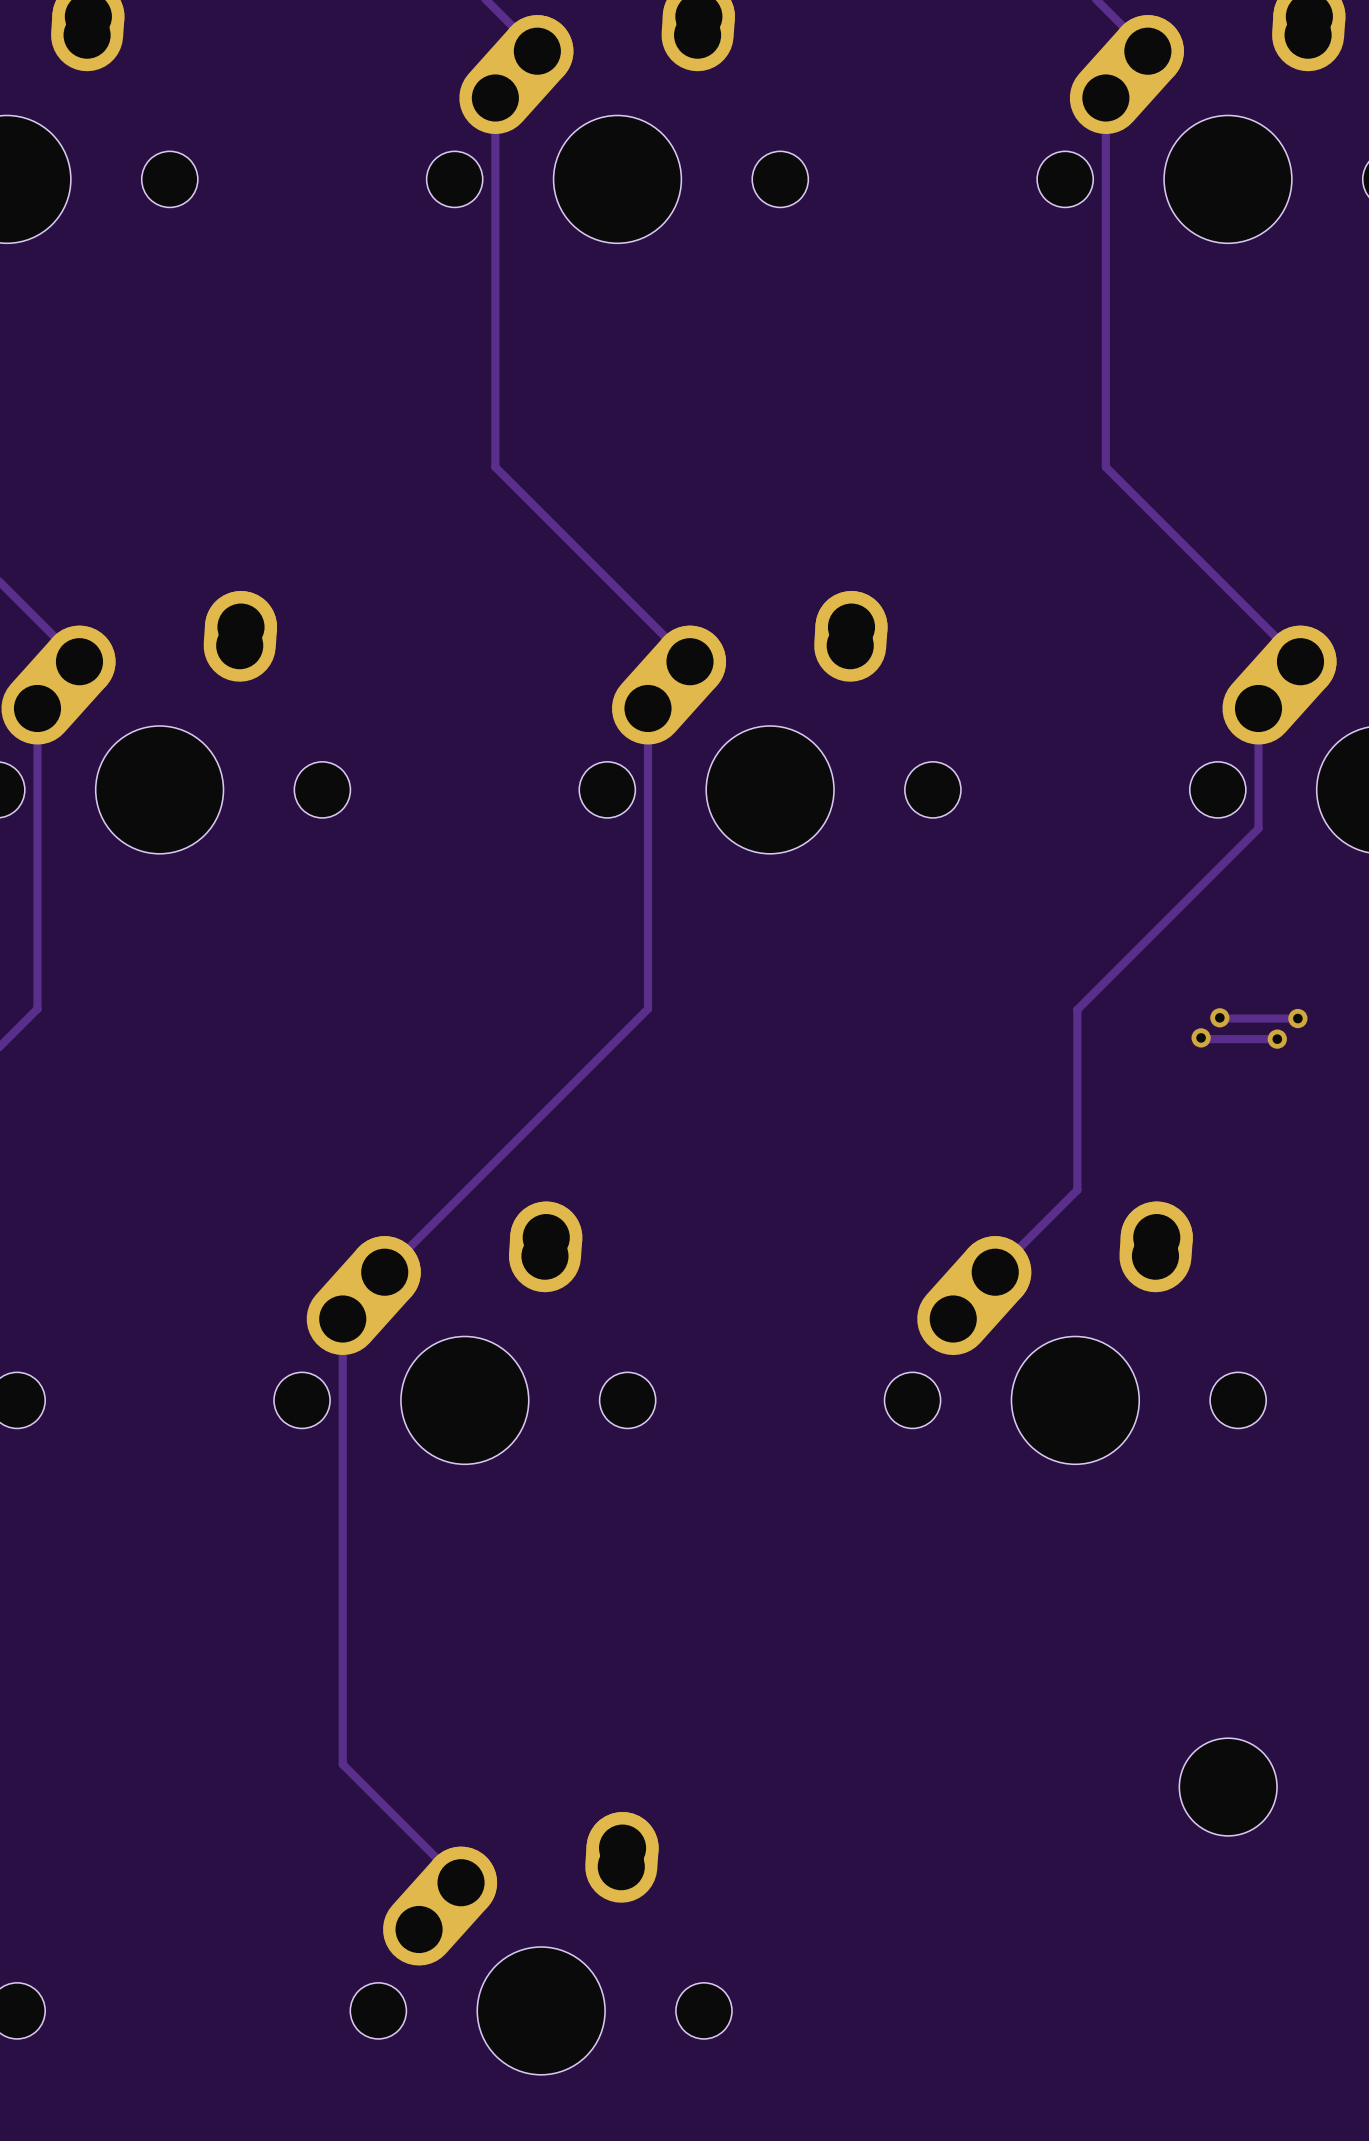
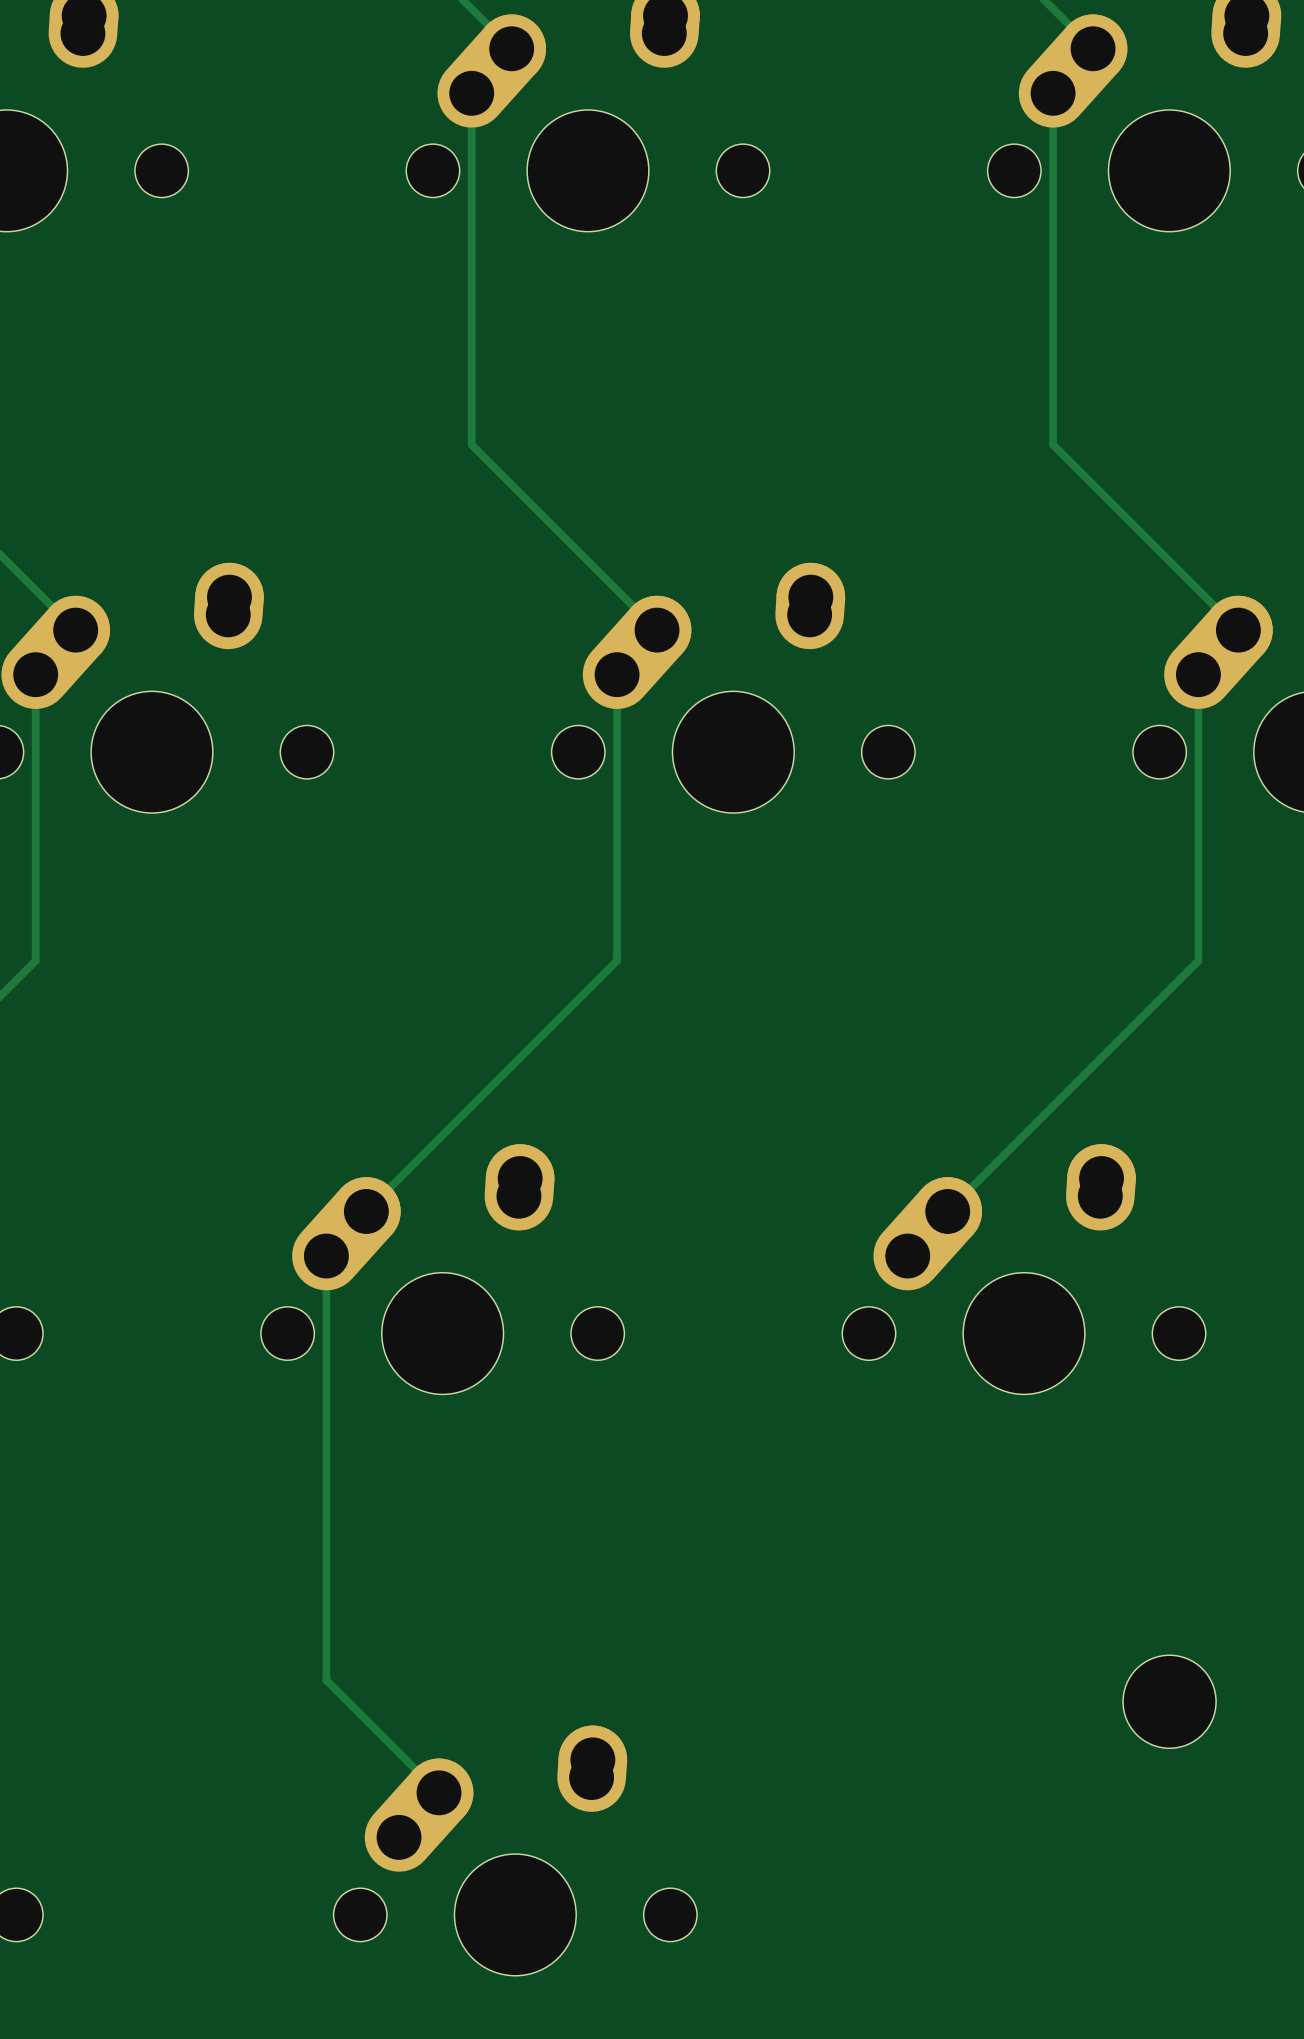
track: (1258, 828) (1077, 1009) (1077, 1190) -> (1198, 789) (1198, 960) (1025, 1133)
track: (1219, 1017) (1297, 1018) -> none
via: (1219, 1017) -> none
via: (1297, 1018) -> none
track: (1201, 1037) (1277, 1039) -> none
via: (1201, 1037) -> none
via: (1277, 1039) -> none

